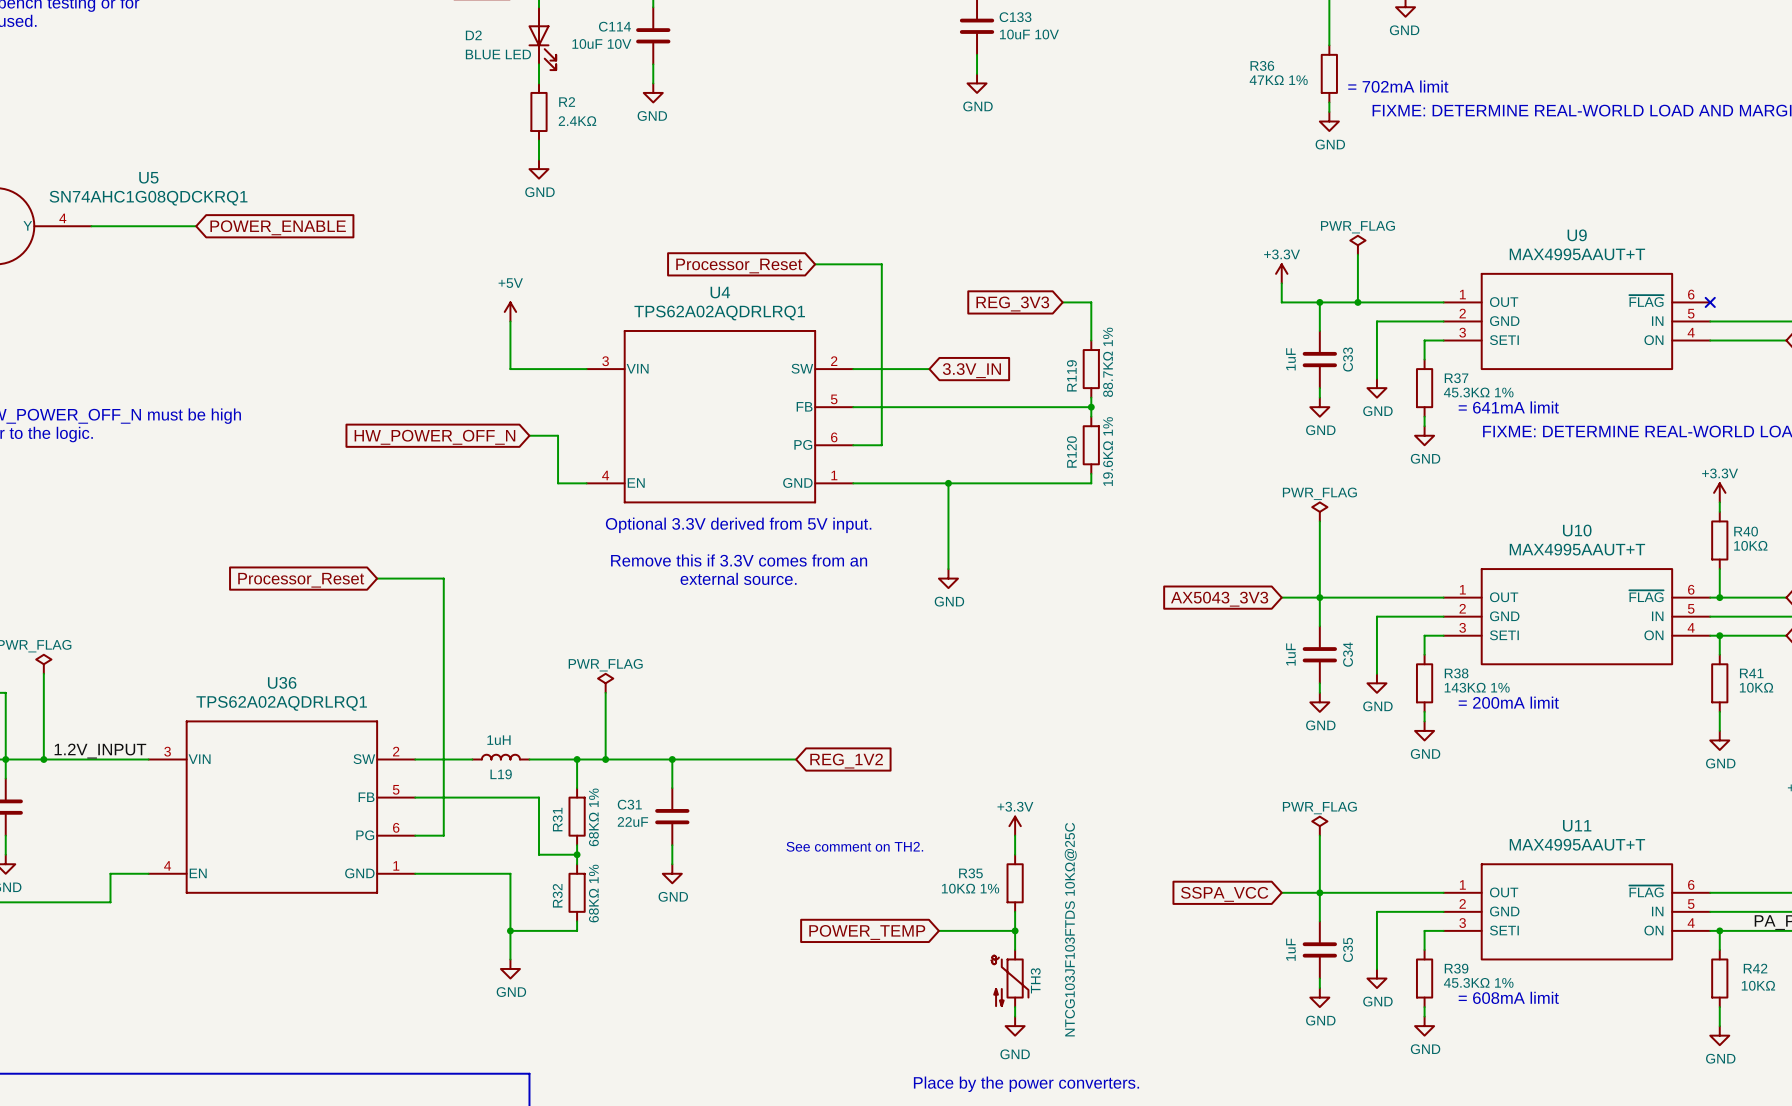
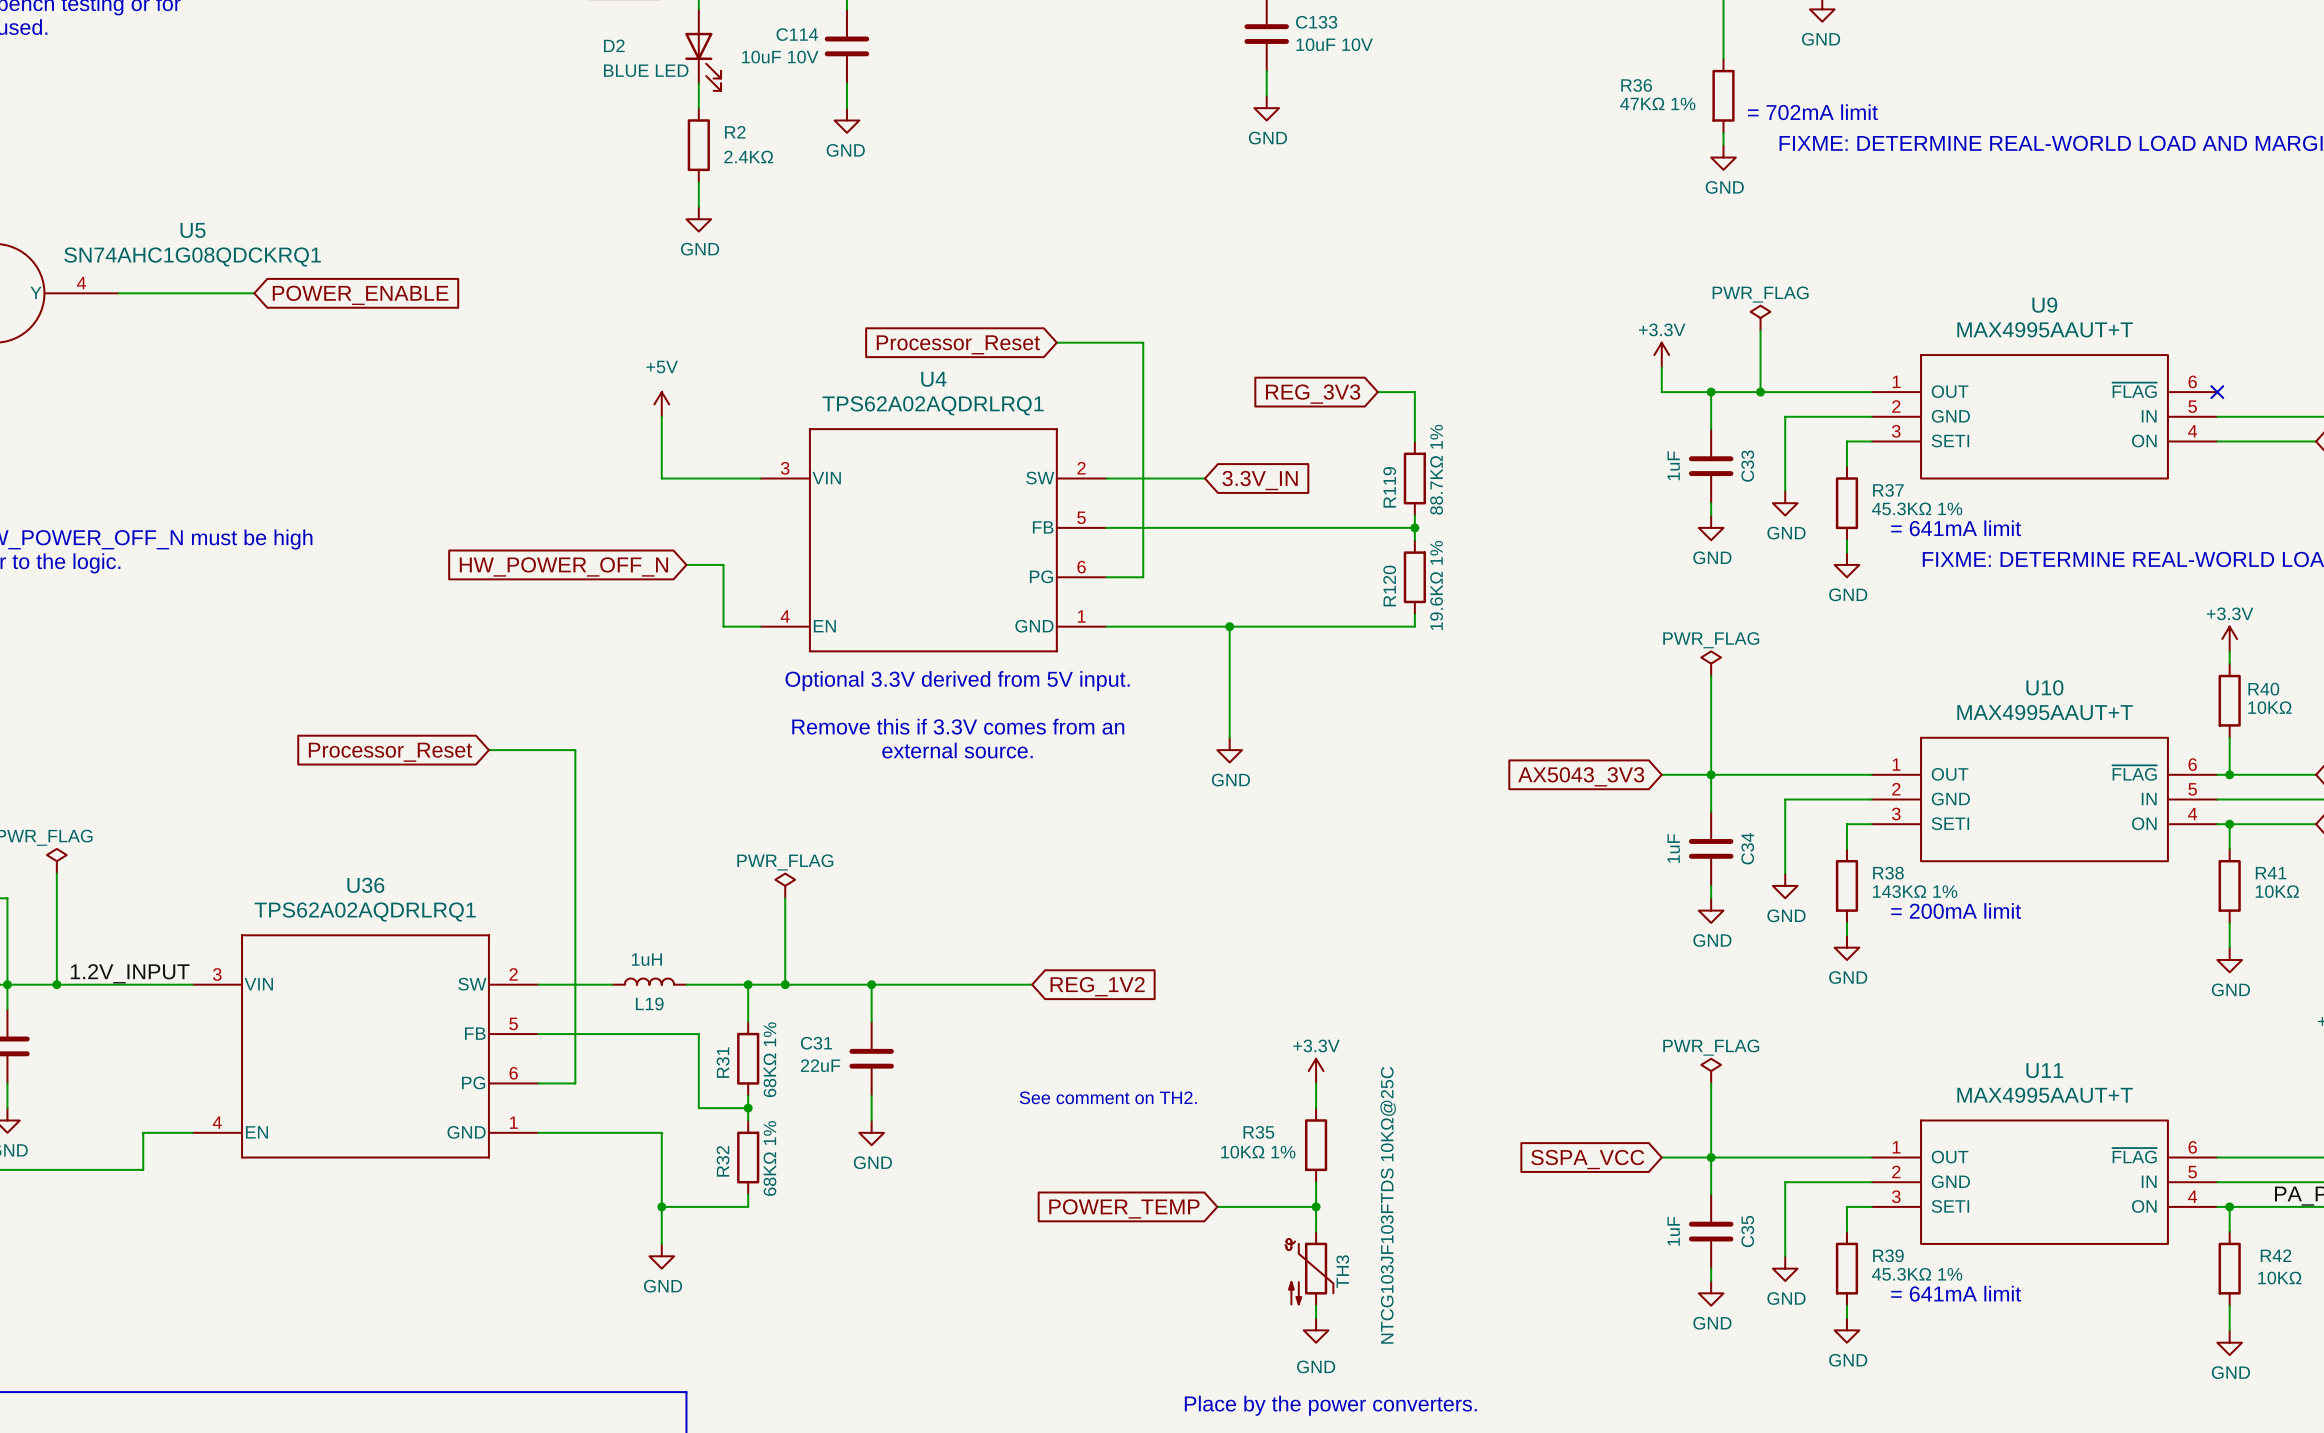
text: = 608mA limit (1508, 997) -> = 641mA limit (1956, 1293)

